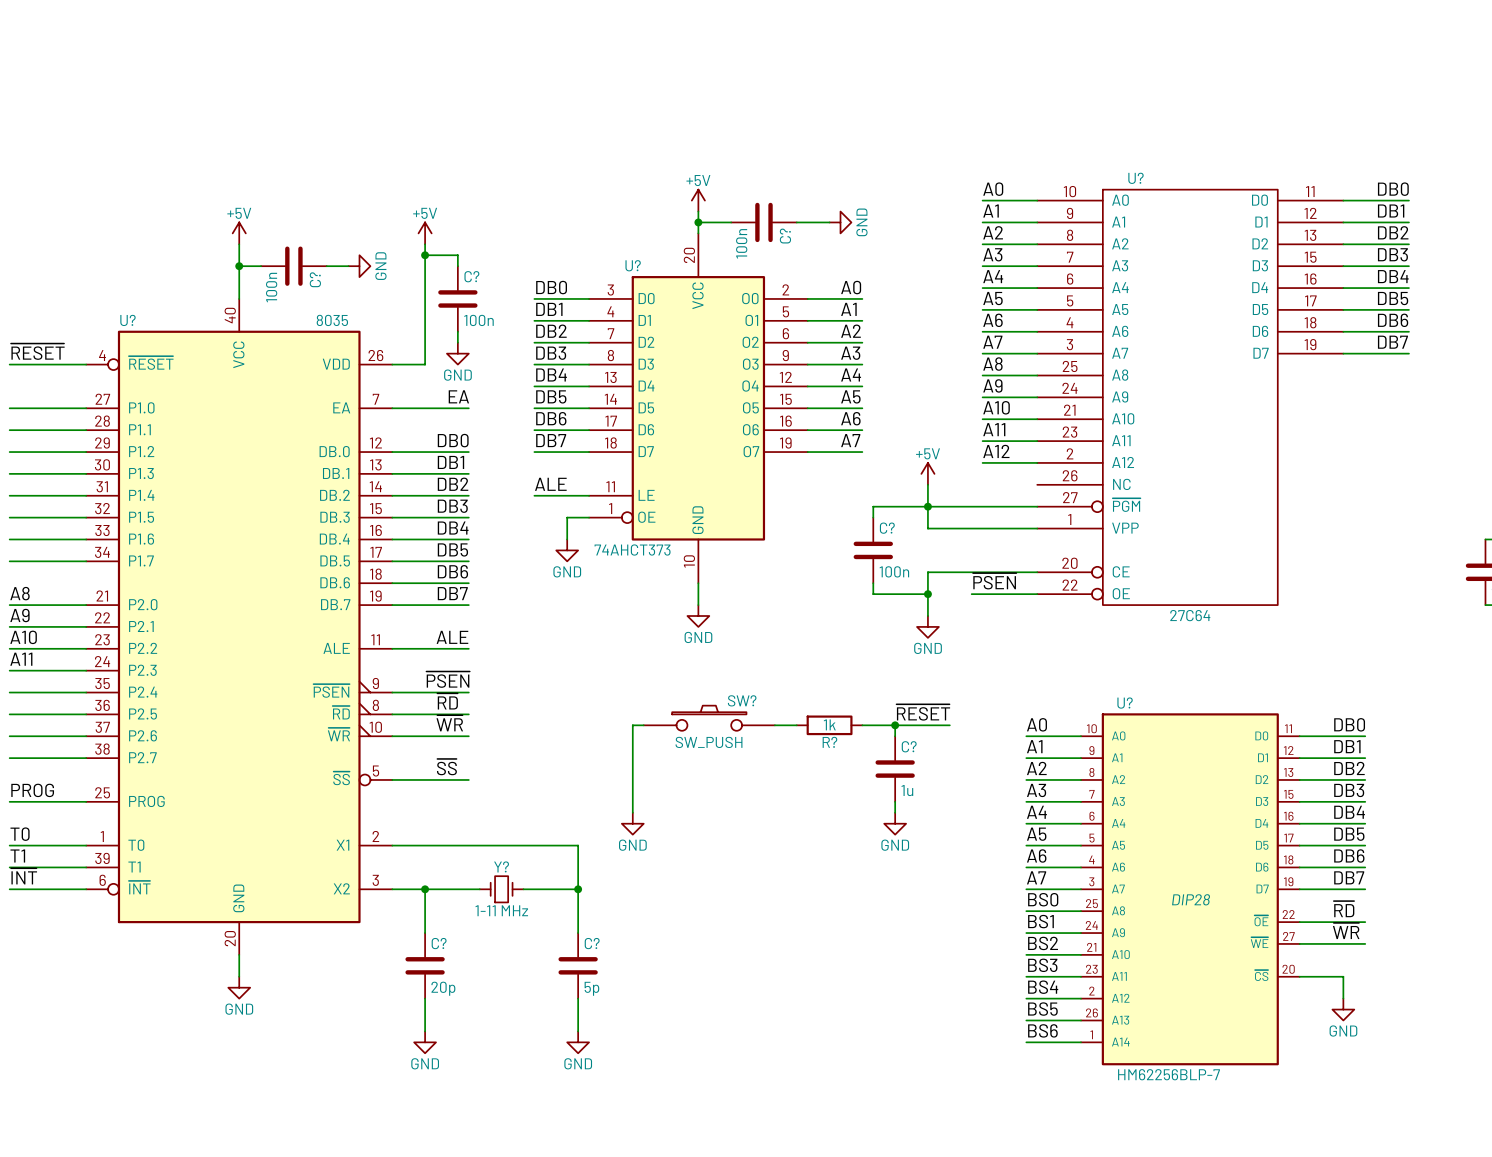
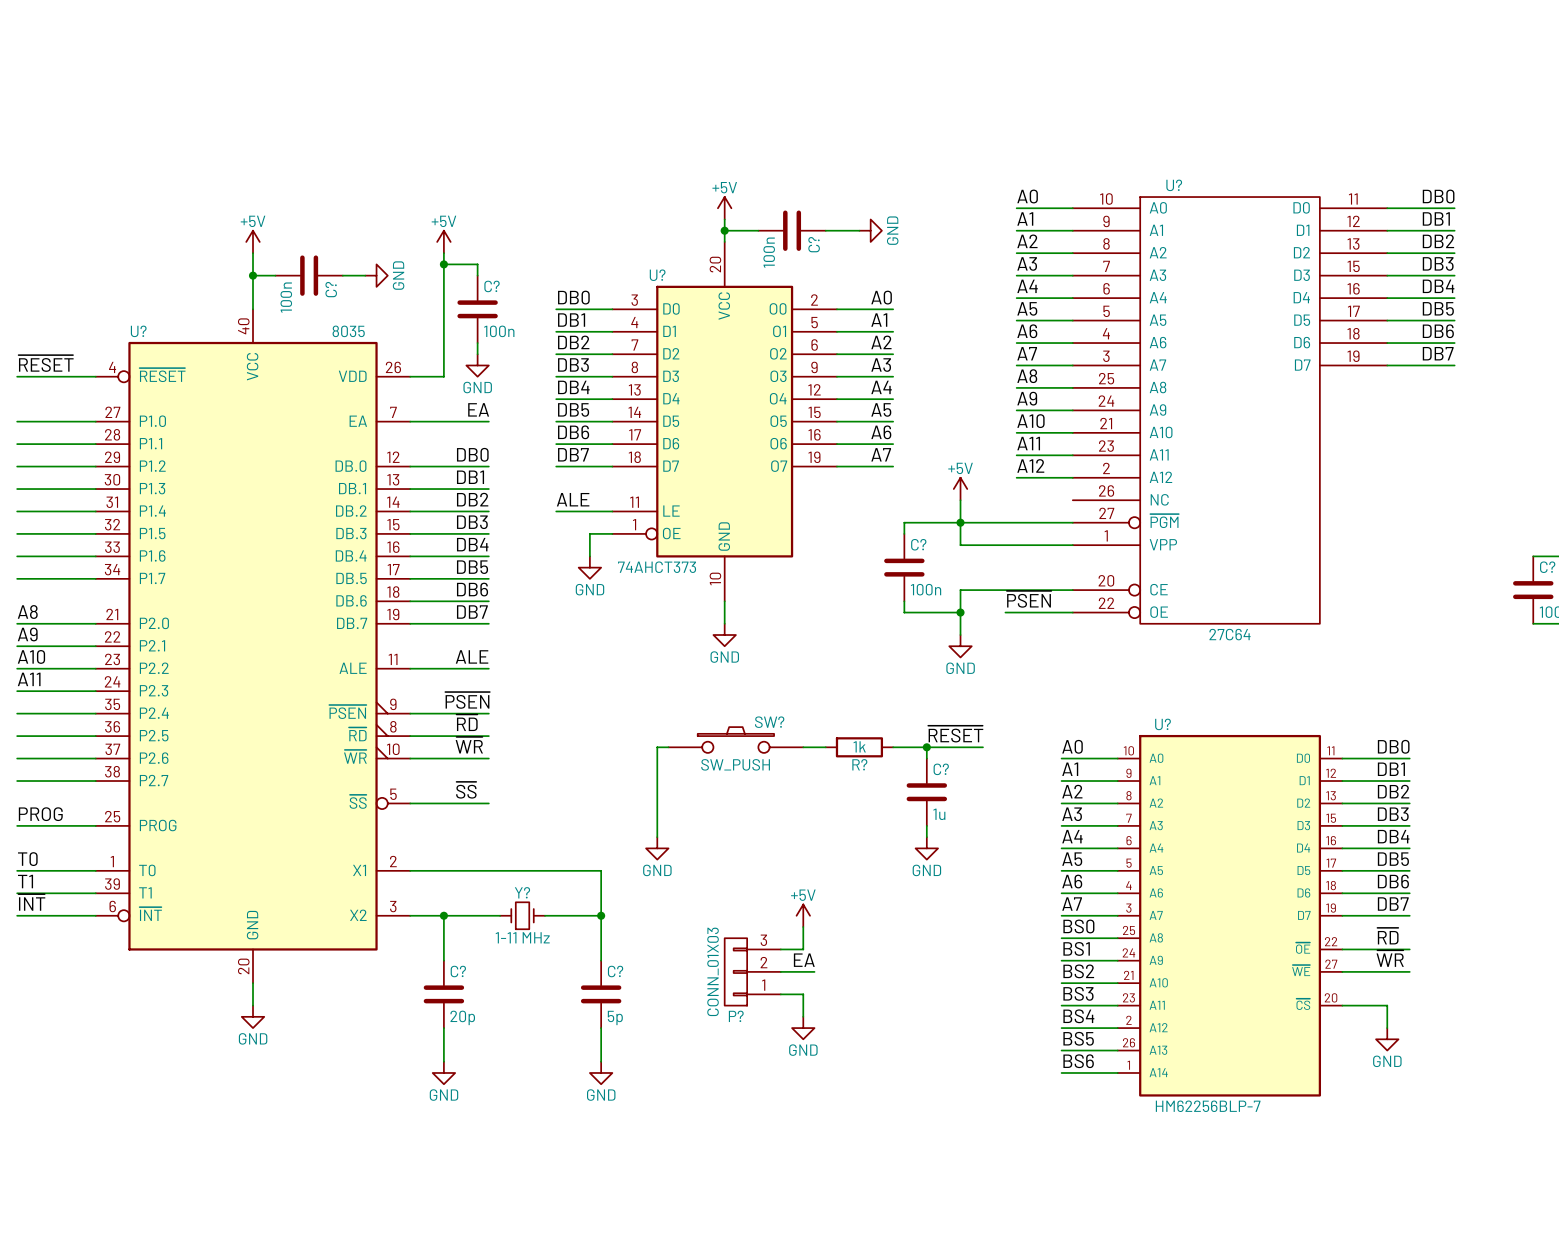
power symbol: none -> +5V (803, 915)
U? text: DIP28 (1191, 899) -> none
wire: none -> (803, 927) (803, 949) (780, 949)
label: none -> EA (804, 960)
P?: none -> CONN_01X03 (752, 971)
wire: none -> (780, 971) (814, 971)
wire: none -> (780, 994) (803, 994) (803, 1016)
power symbol: none -> GND (803, 1028)

